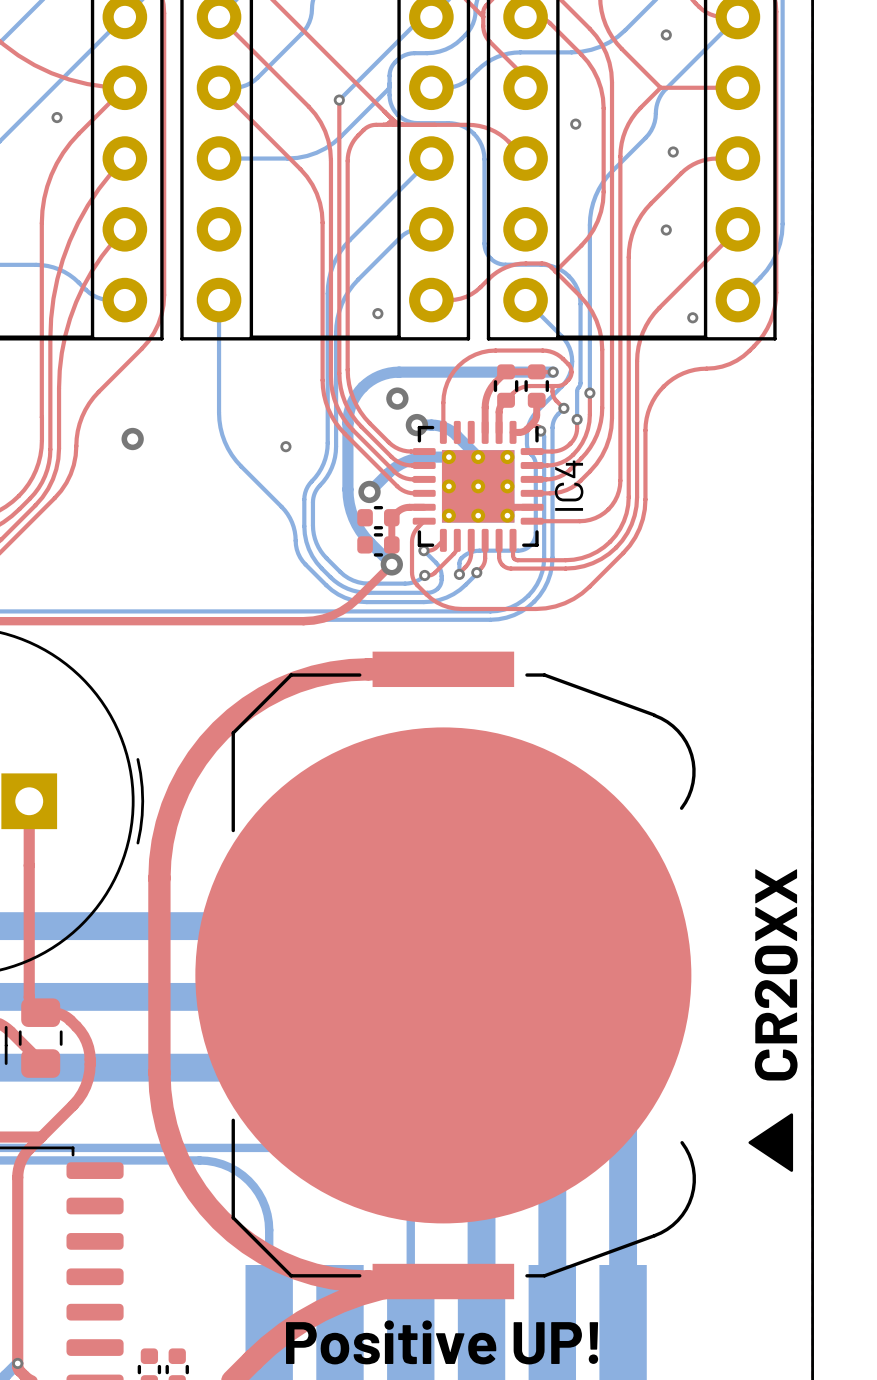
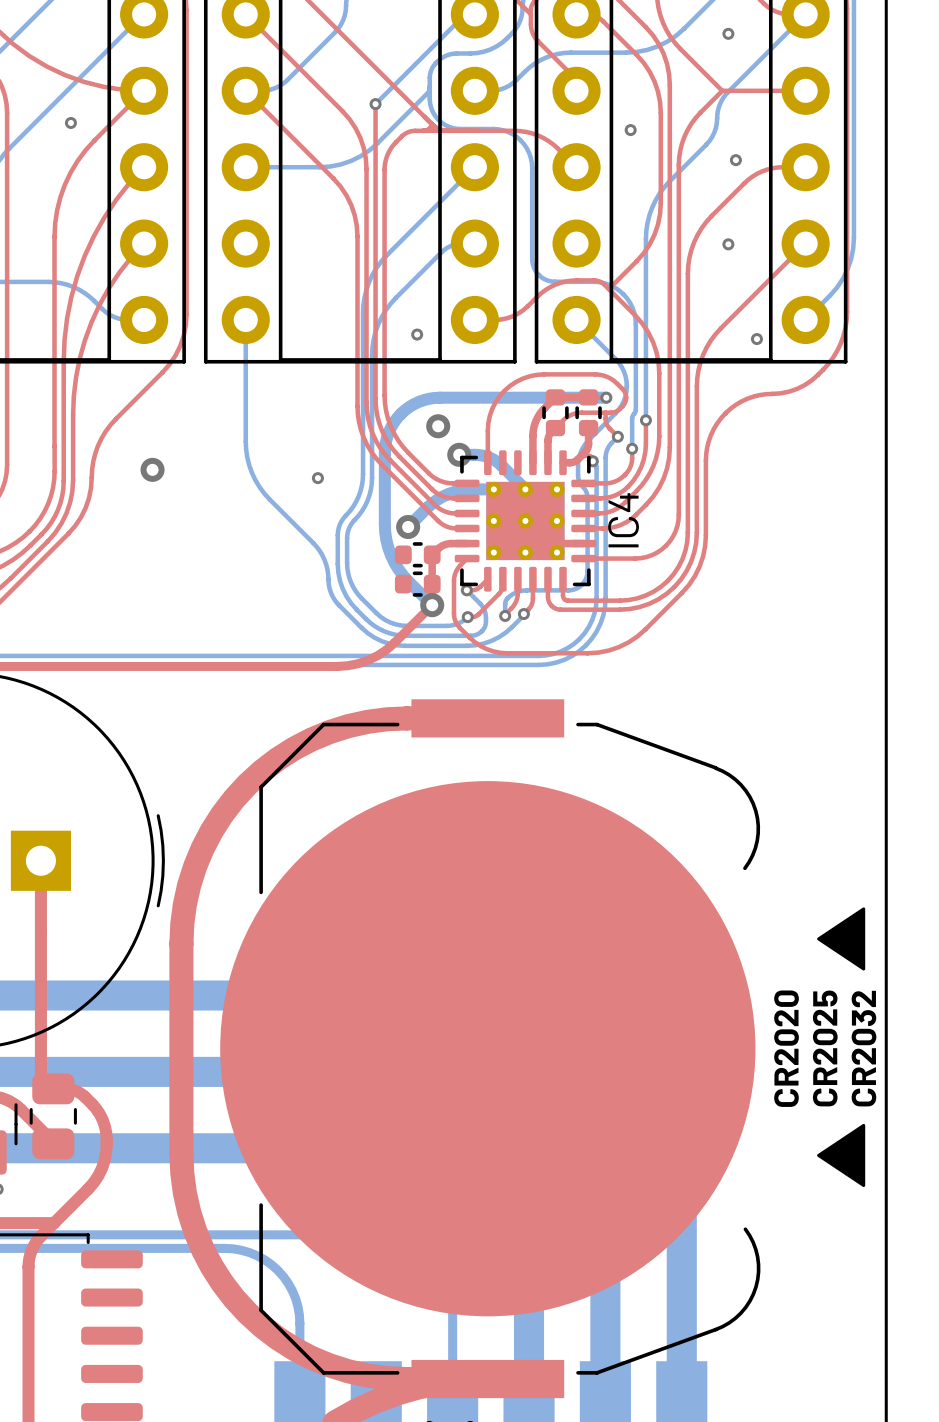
drawing: none -> [817, 907, 866, 971]
text: CR20XX (776, 974) -> none
text: none -> CR2020 (786, 1048)
text: none -> CR2025 (825, 1048)
text: none -> CR2032 (863, 1048)
drawing position: (770, 1142) -> (841, 1155)

